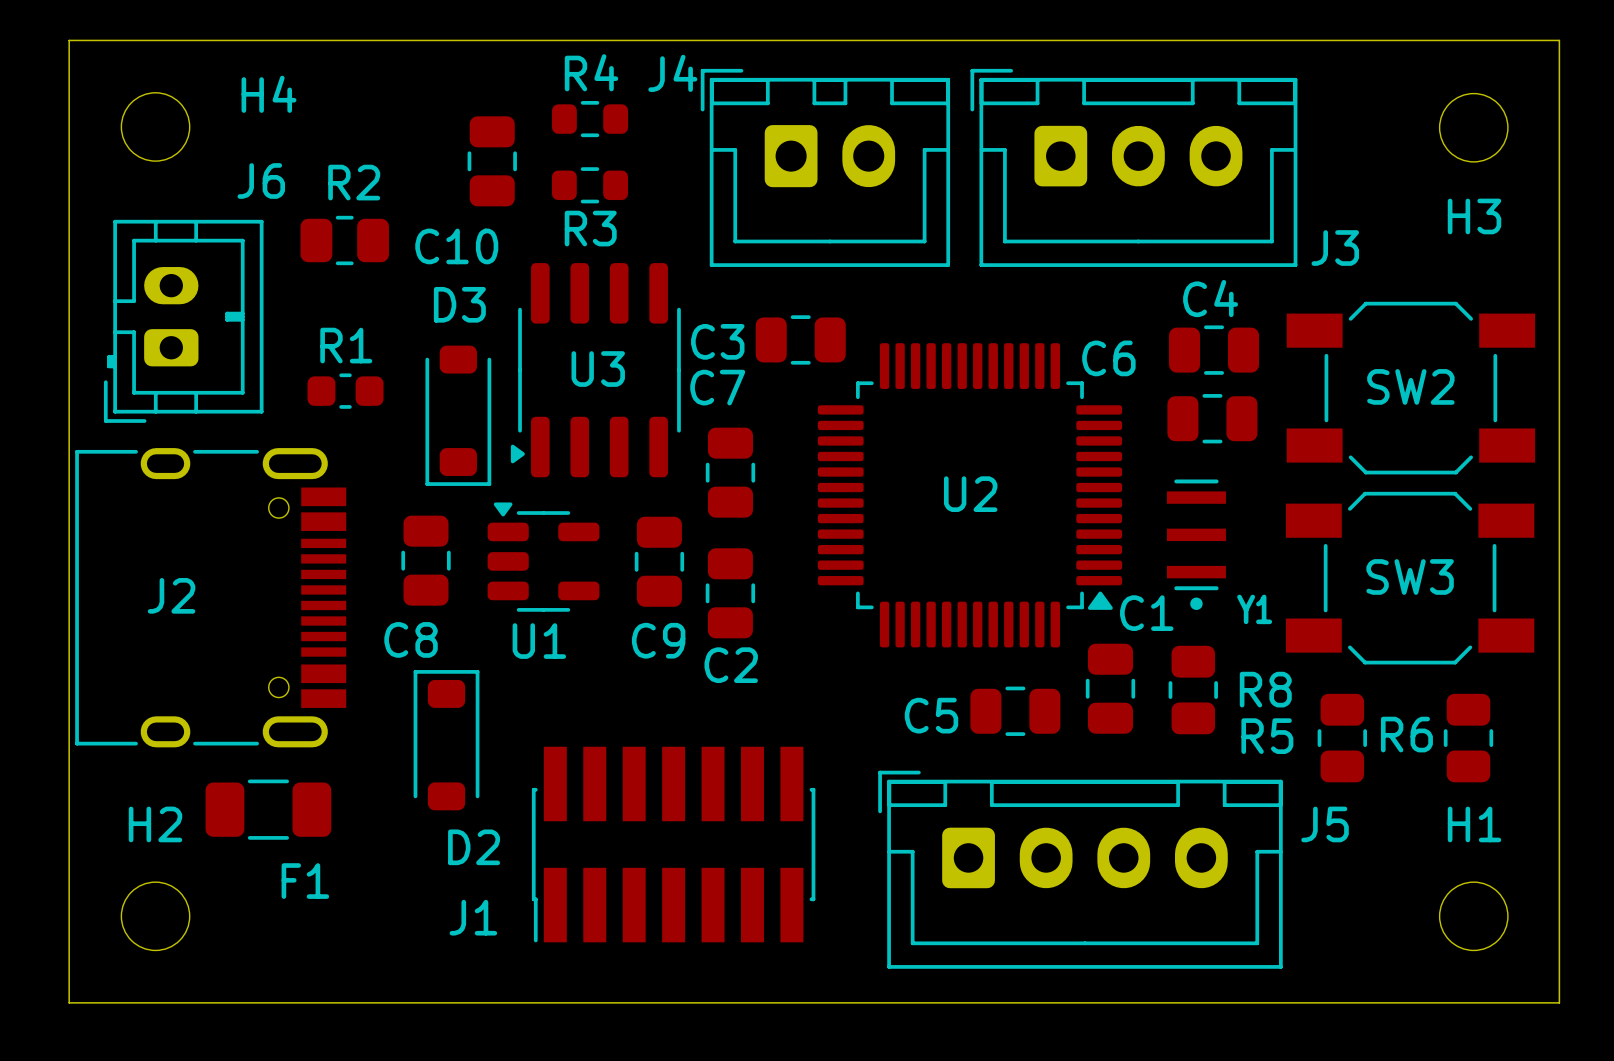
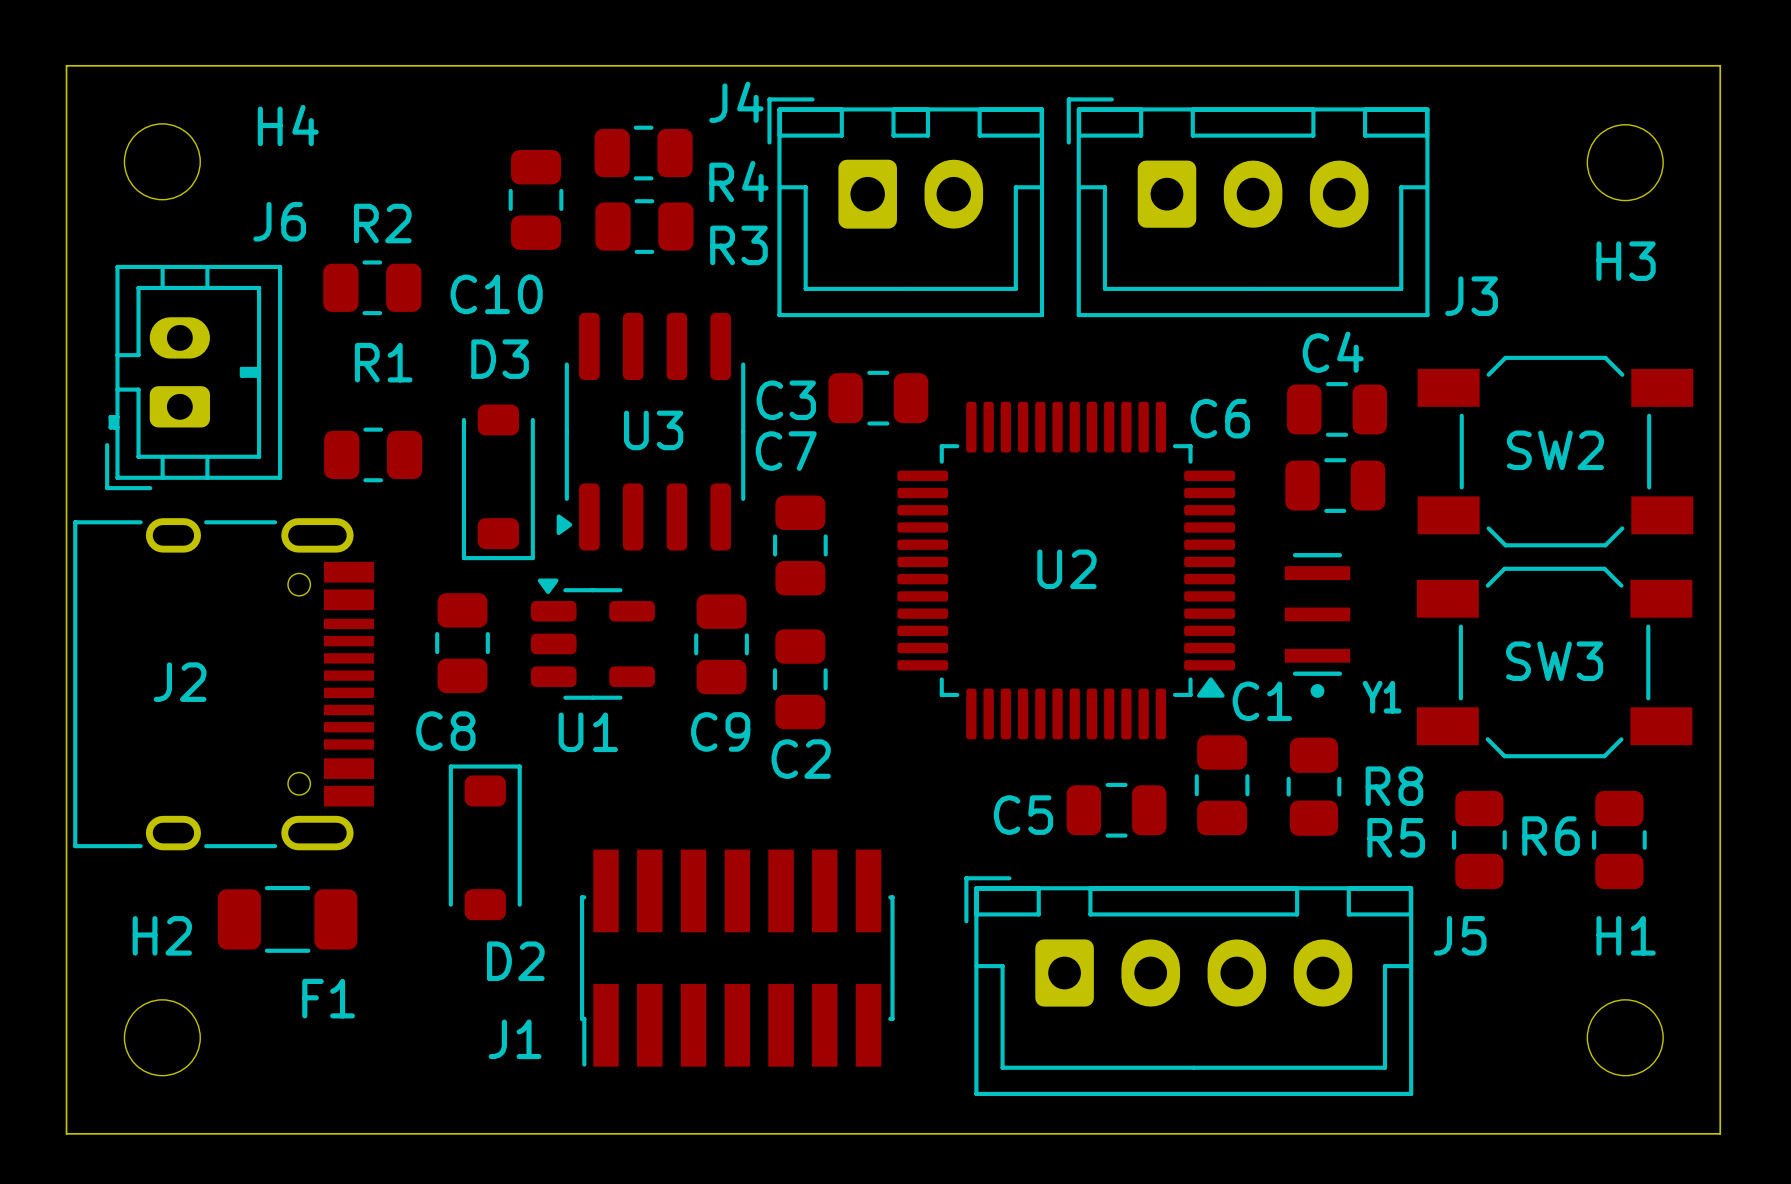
R4 name position: R4 (591, 72) -> R4 (738, 181)
R4 footprint: [552, 100, 629, 138] -> [594, 125, 693, 181]
R3 footprint: [551, 167, 629, 204] -> [595, 199, 694, 254]
R3 name position: R3 (590, 228) -> R3 (738, 245)
R1 name position: R1 (346, 345) -> R1 (383, 362)
R1 footprint: [307, 373, 384, 409] -> [324, 427, 423, 483]

